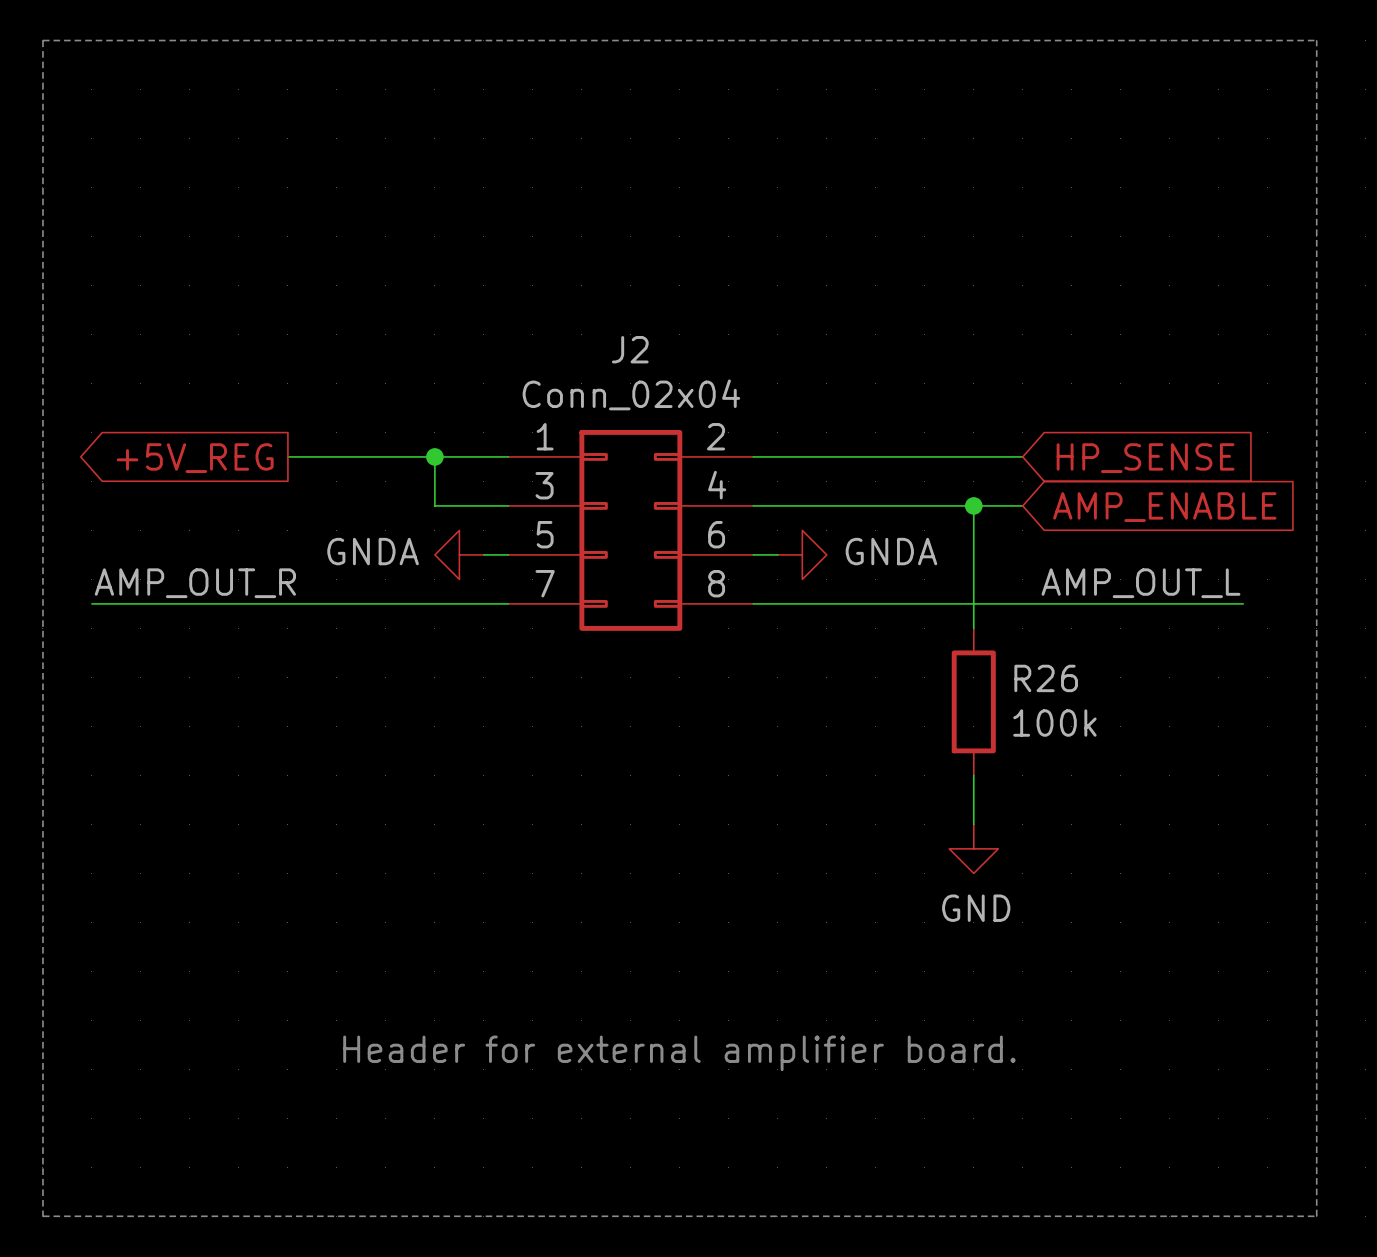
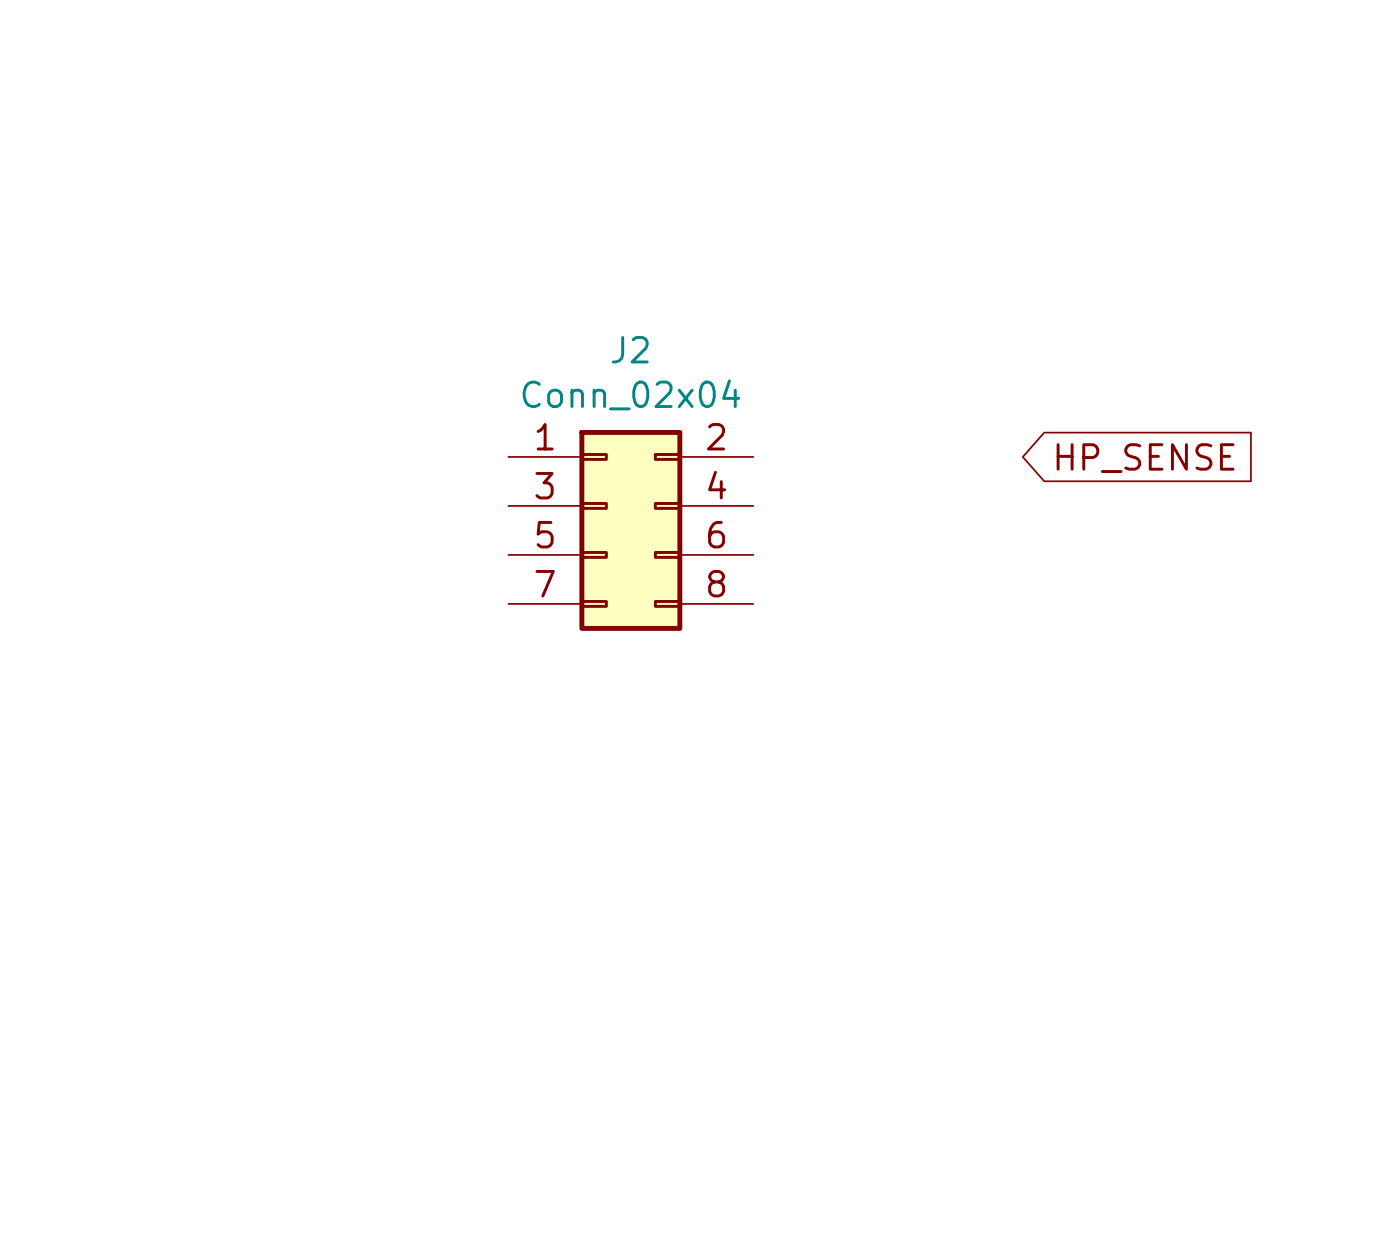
line: (42, 40) (42, 1216) (1316, 1216) (1316, 40) (42, 40) -> none
wire: (287, 456) (508, 456) -> none
wire: (434, 456) (434, 505) (508, 505) -> none
junction: (434, 456) -> none
wire: (753, 456) (1022, 456) -> none
global label: +5V_REG (195, 458) -> none
wire: (753, 505) (1022, 505) -> none
wire: (973, 505) (973, 628) -> none
junction: (973, 505) -> none
global label: AMP_ENABLE (1164, 507) -> none
power symbol: GNDA (459, 554) -> none
wire: (483, 554) (508, 554) -> none
wire: (753, 554) (777, 554) -> none
power symbol: GNDA (802, 554) -> none
label: AMP_OUT_R (195, 583) -> none
label: AMP_OUT_L (1140, 583) -> none
wire: (91, 603) (508, 603) -> none
wire: (753, 603) (1243, 603) -> none
R26: 100k (973, 701) -> none
wire: (973, 775) (973, 824) -> none
power symbol: GND (973, 848) -> none
text: Header for external amplifier board. (679, 1053) -> none

